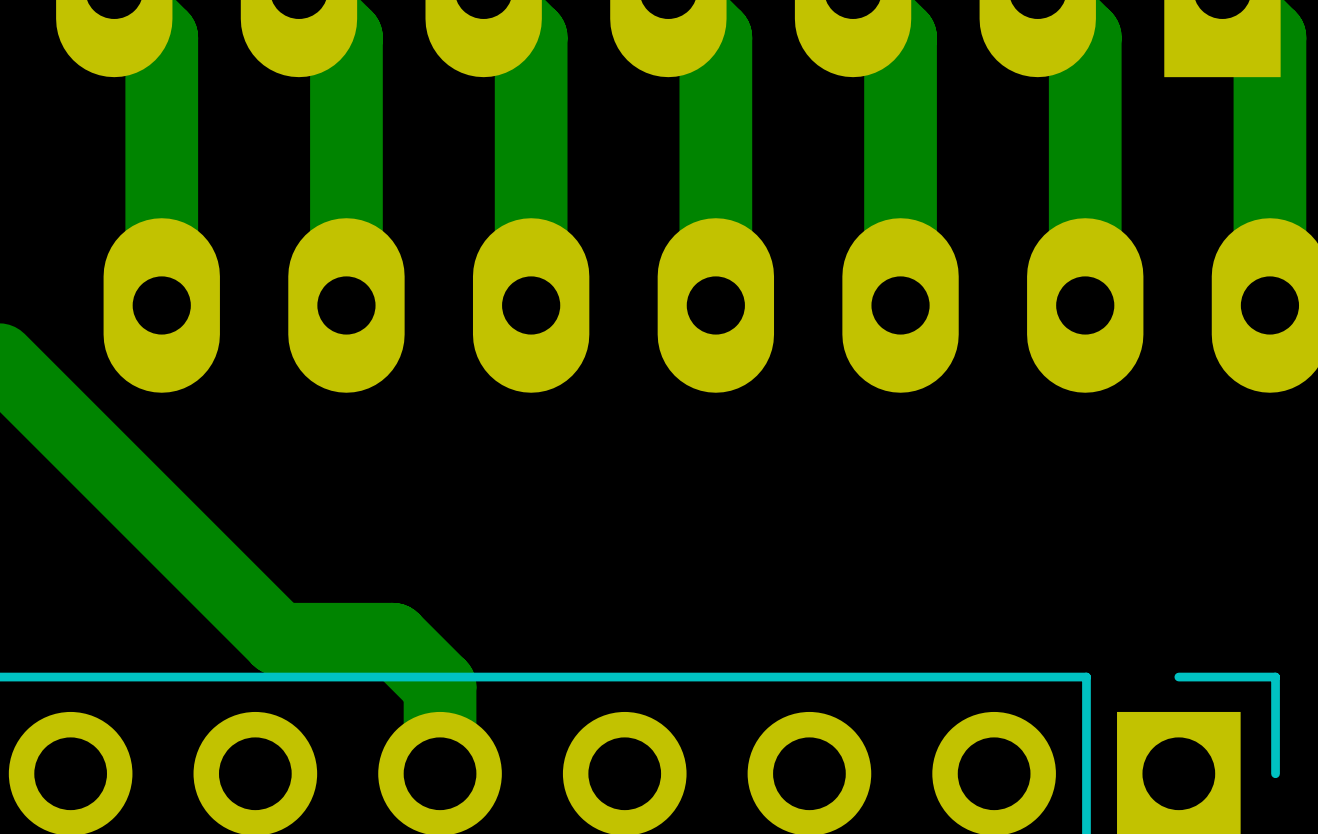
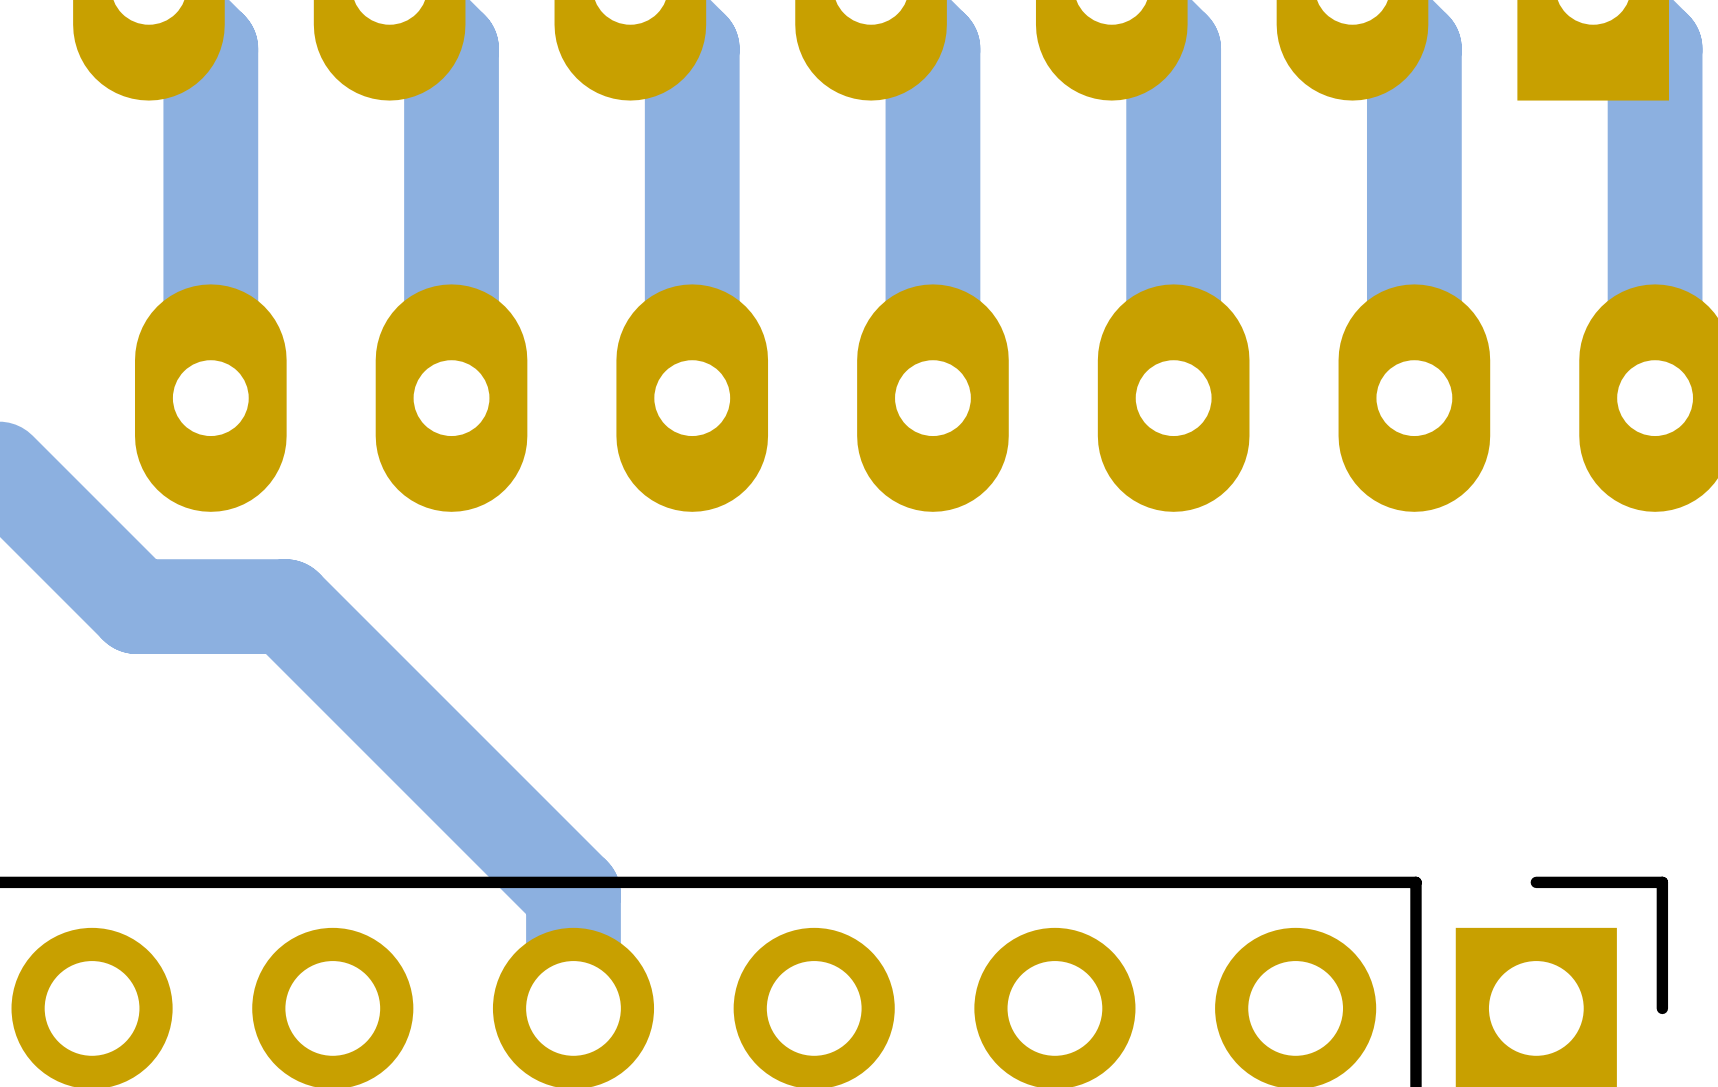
track: (104, 465) (278, 639) (392, 639) -> (136, 606) (285, 606) (512, 833)

